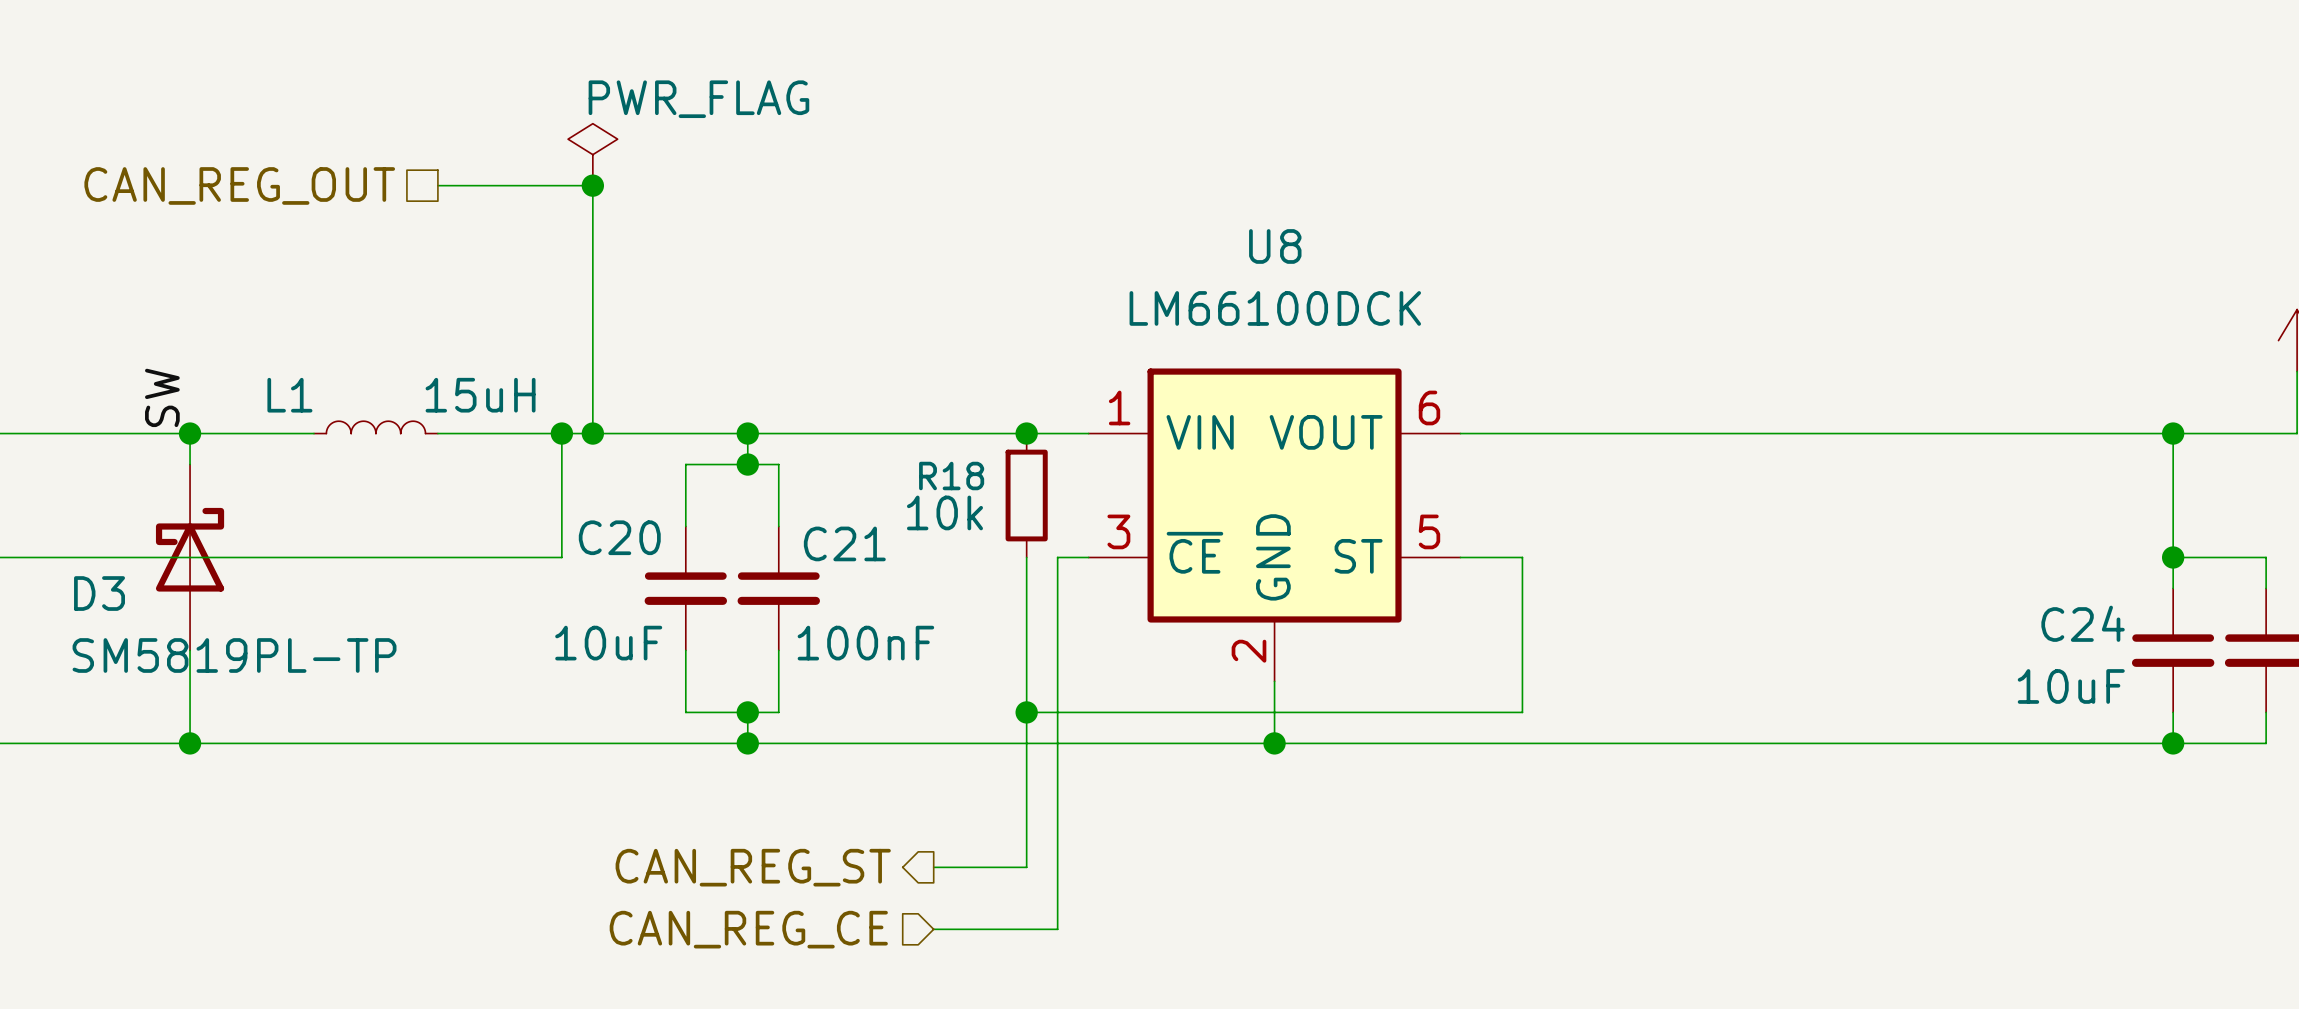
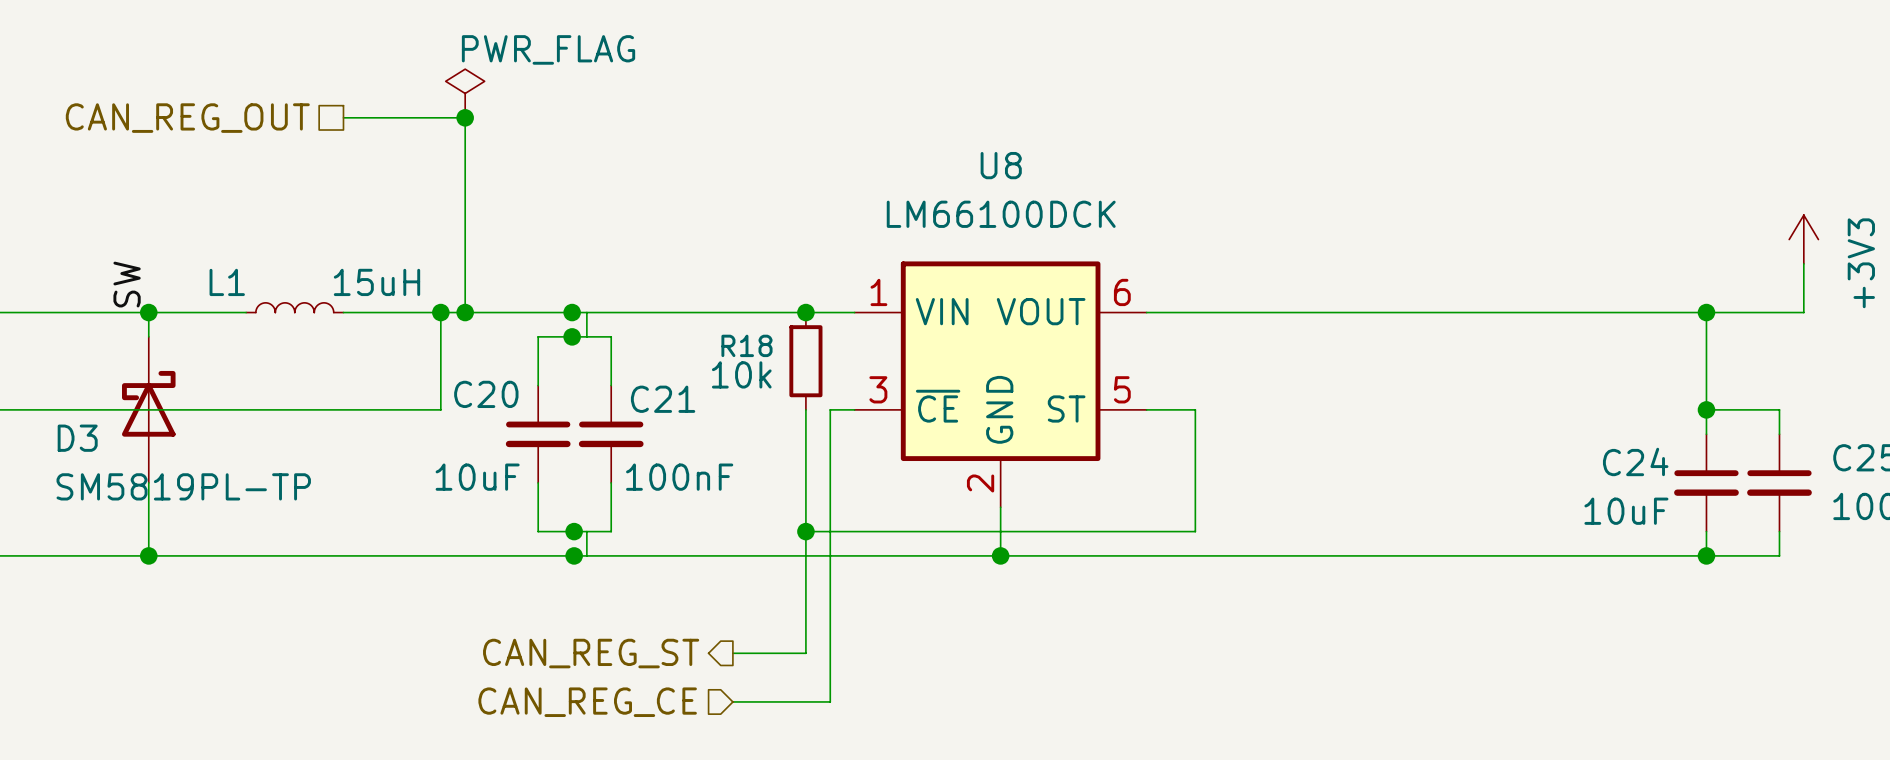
junction position: (747, 433) -> (572, 312)
junction position: (747, 464) -> (572, 336)
junction position: (747, 712) -> (574, 531)
junction position: (747, 743) -> (574, 555)

